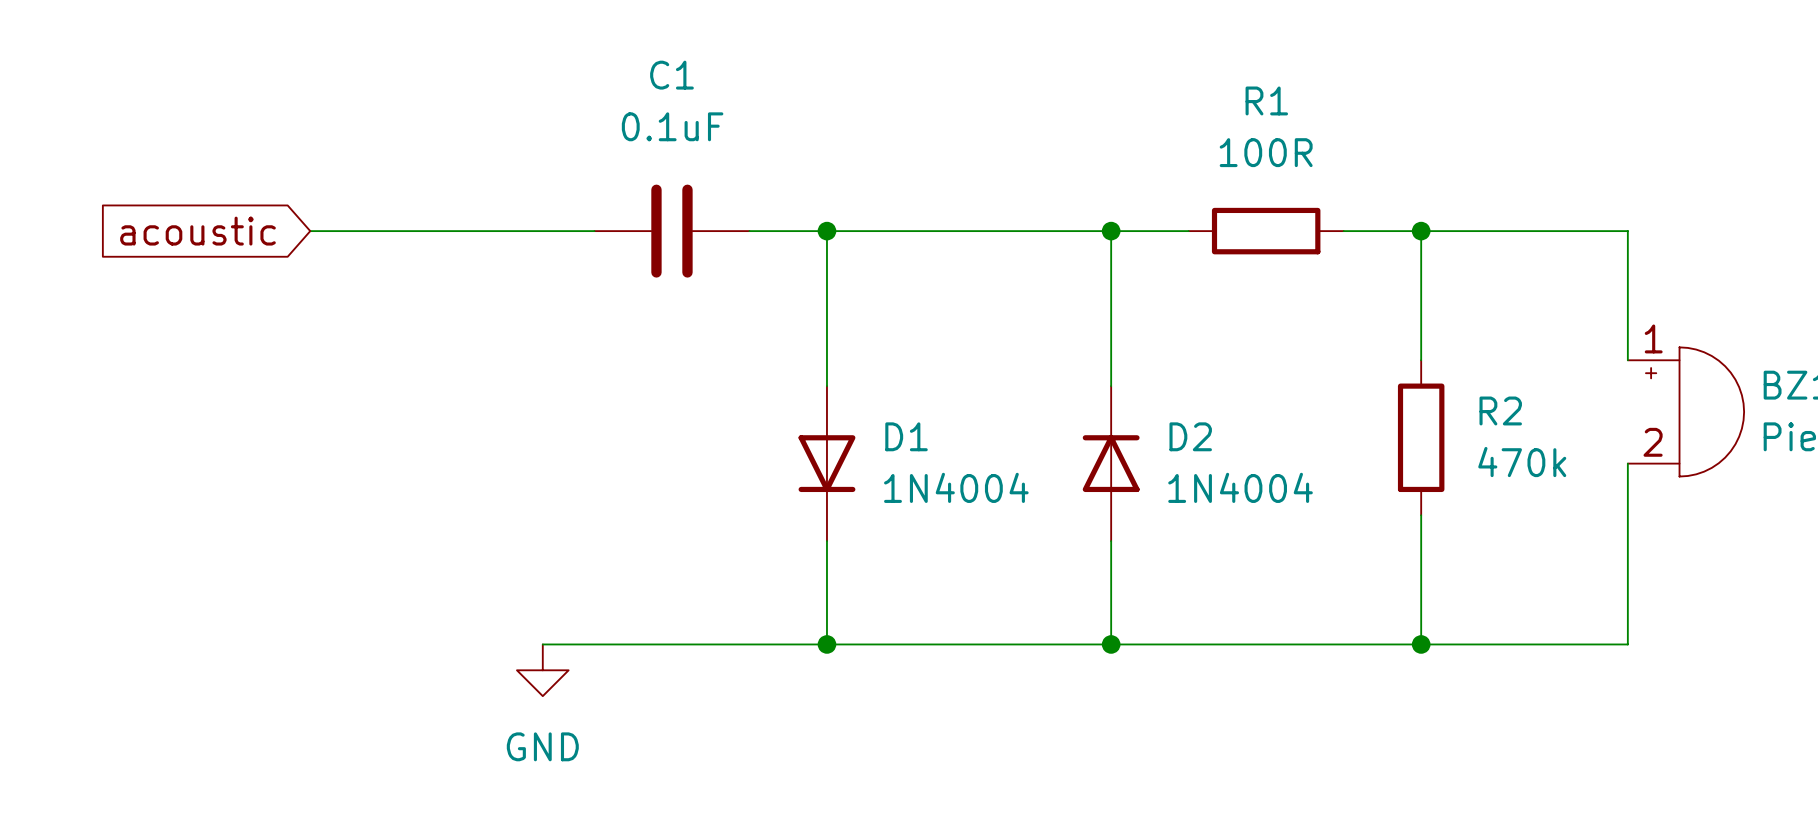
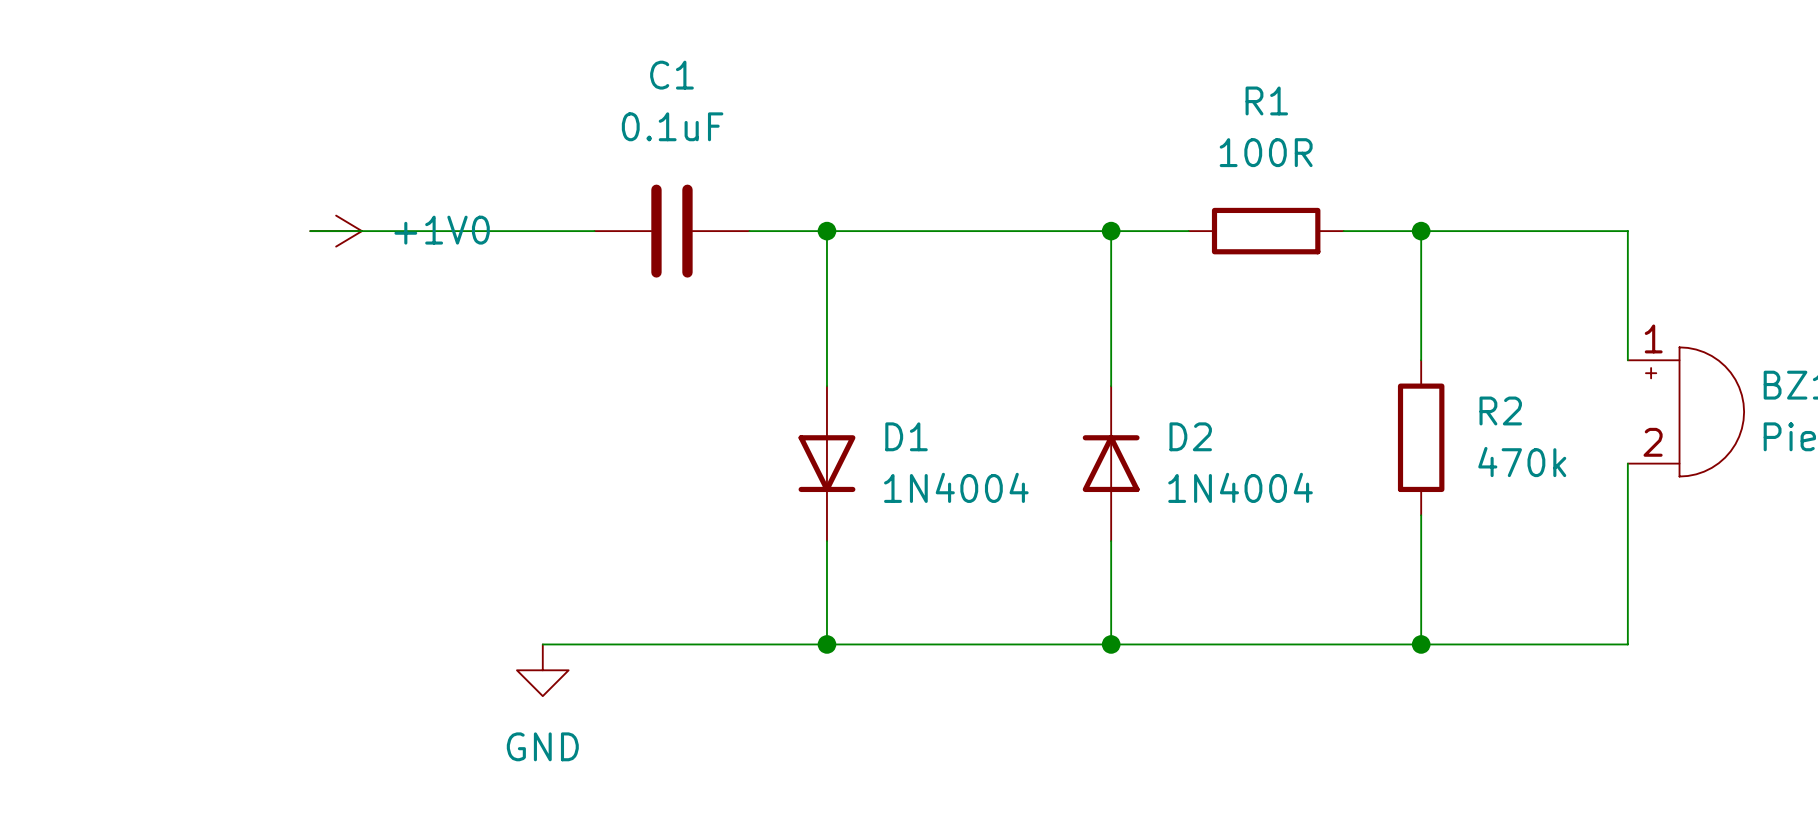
global label: acoustic (197, 231) -> none
power symbol: none -> +1V0 (336, 231)

